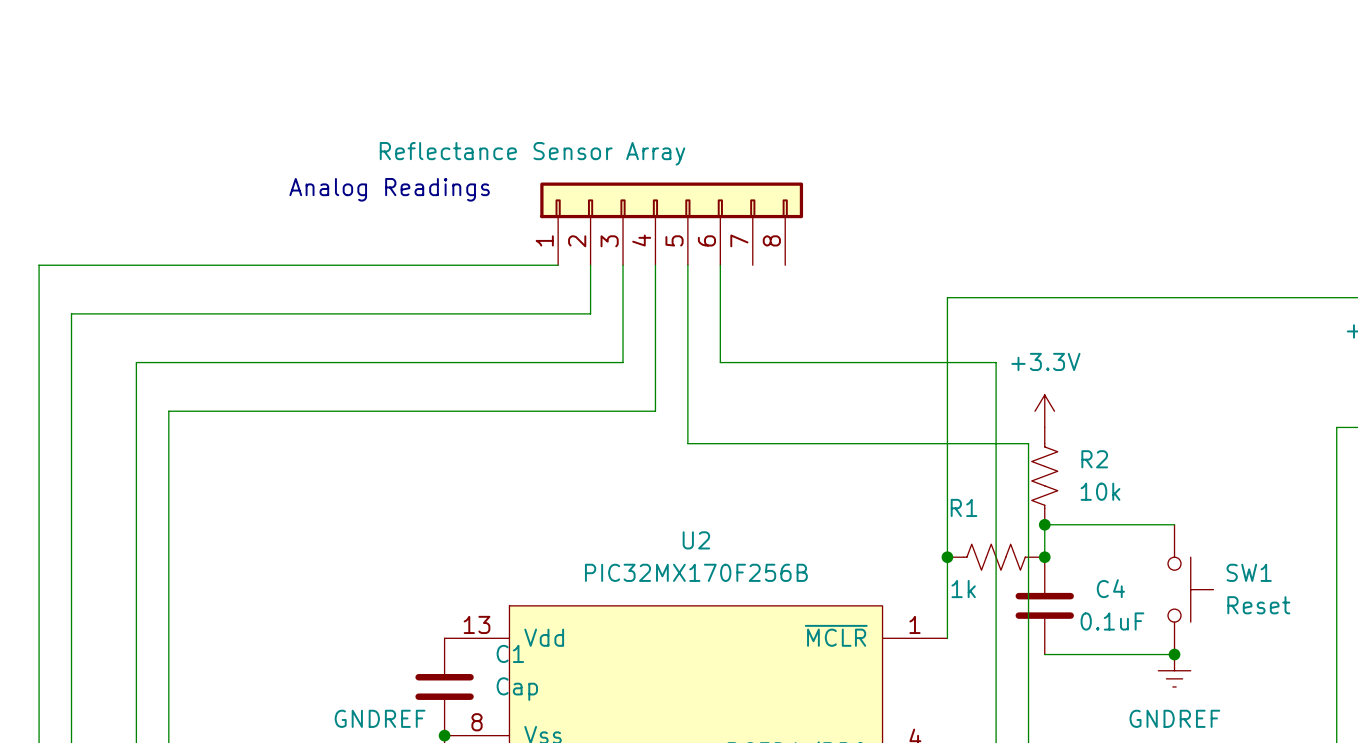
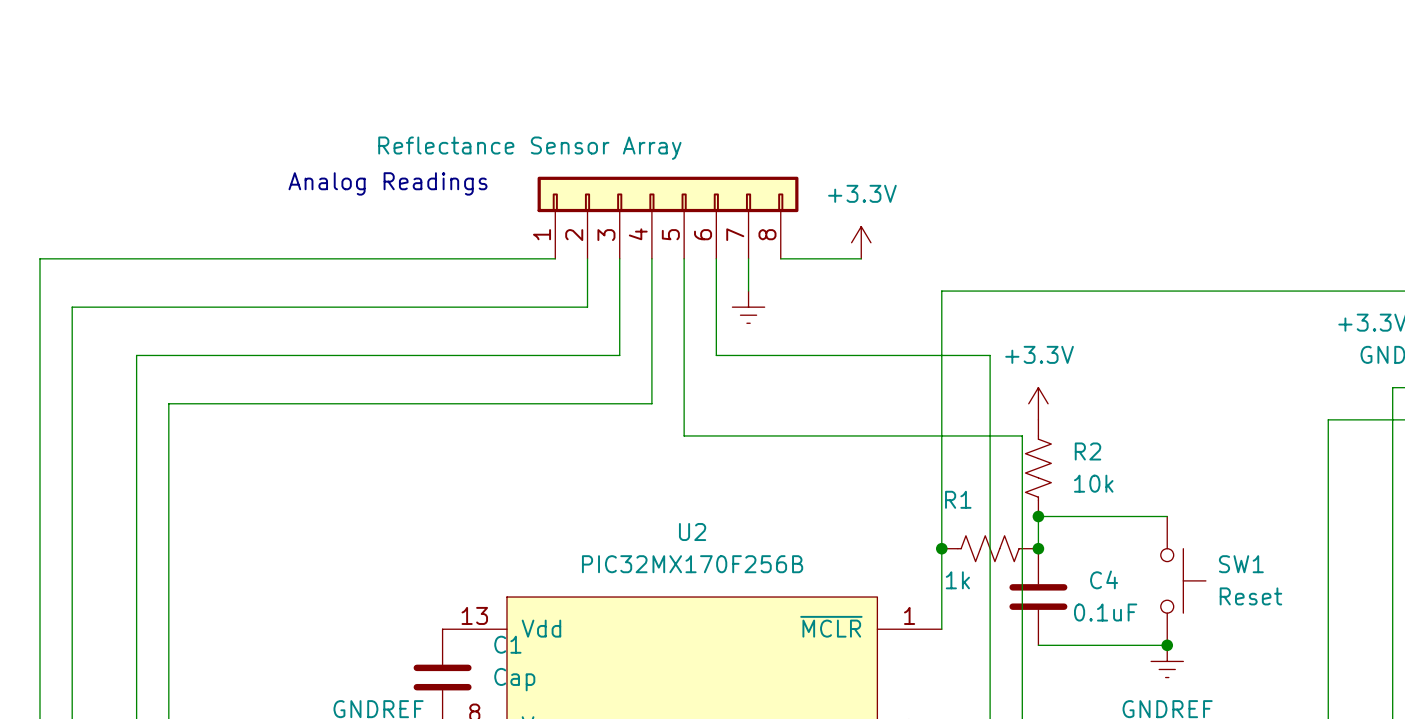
power symbol: none -> +3.3V (861, 242)
wire: none -> (748, 258) (748, 291)
wire: none -> (780, 258) (861, 258)
power symbol: none -> (748, 307)

